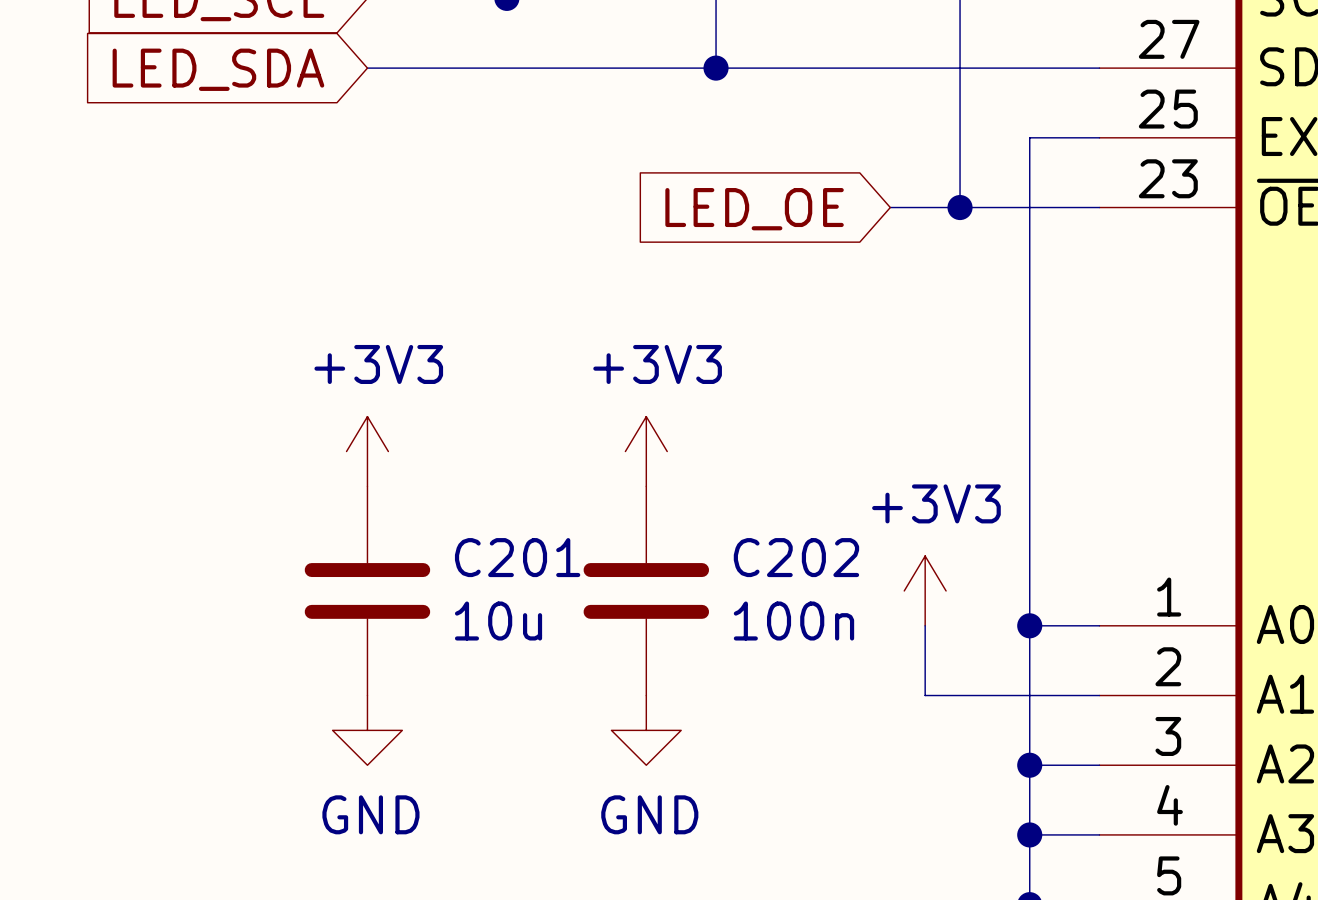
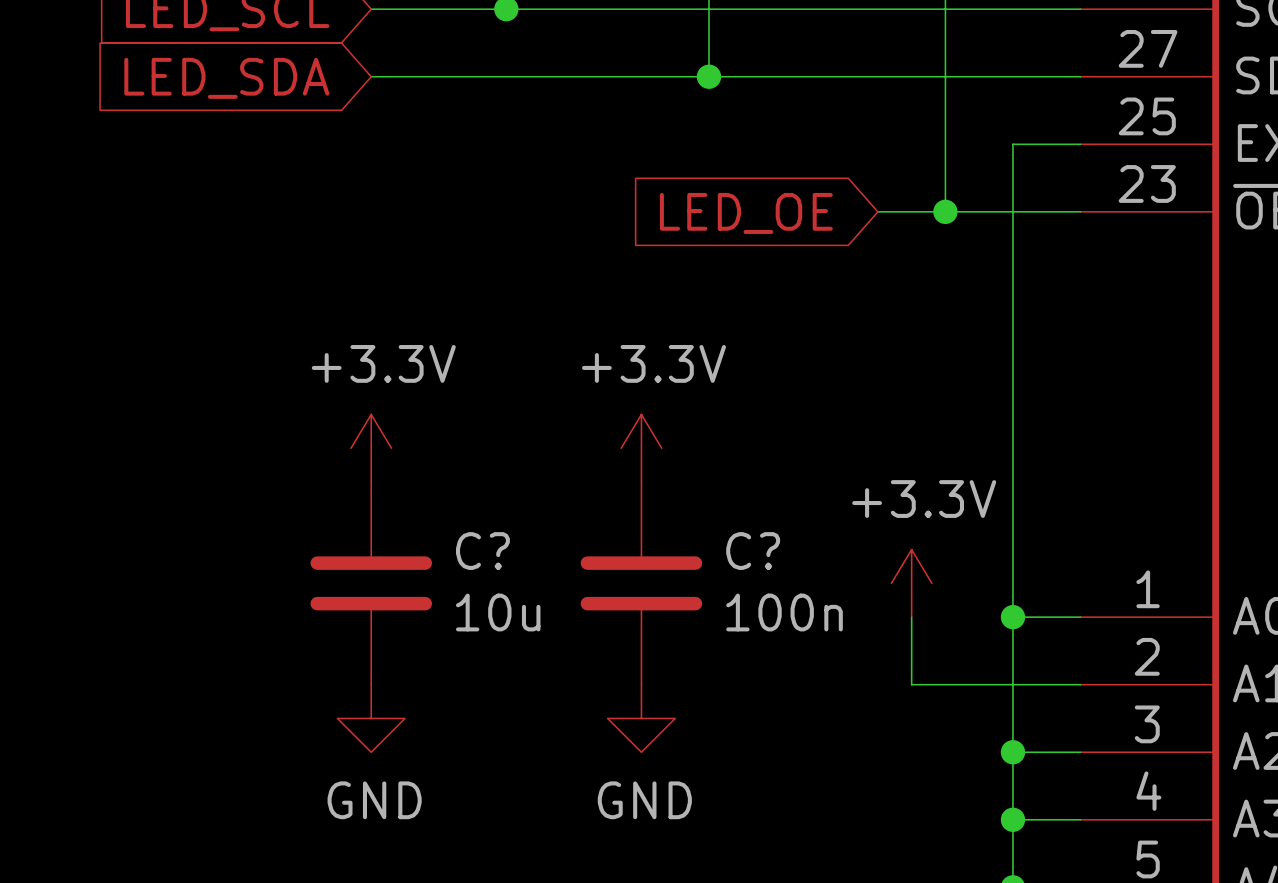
power symbol: +3V3 (367, 451) -> +3.3V (371, 448)
power symbol: +3V3 (646, 451) -> +3.3V (641, 448)
C201 name: C201 (517, 557) -> C? (482, 551)
C202 name: C202 (796, 557) -> C? (753, 551)
power symbol: +3V3 (925, 590) -> +3.3V (911, 583)

